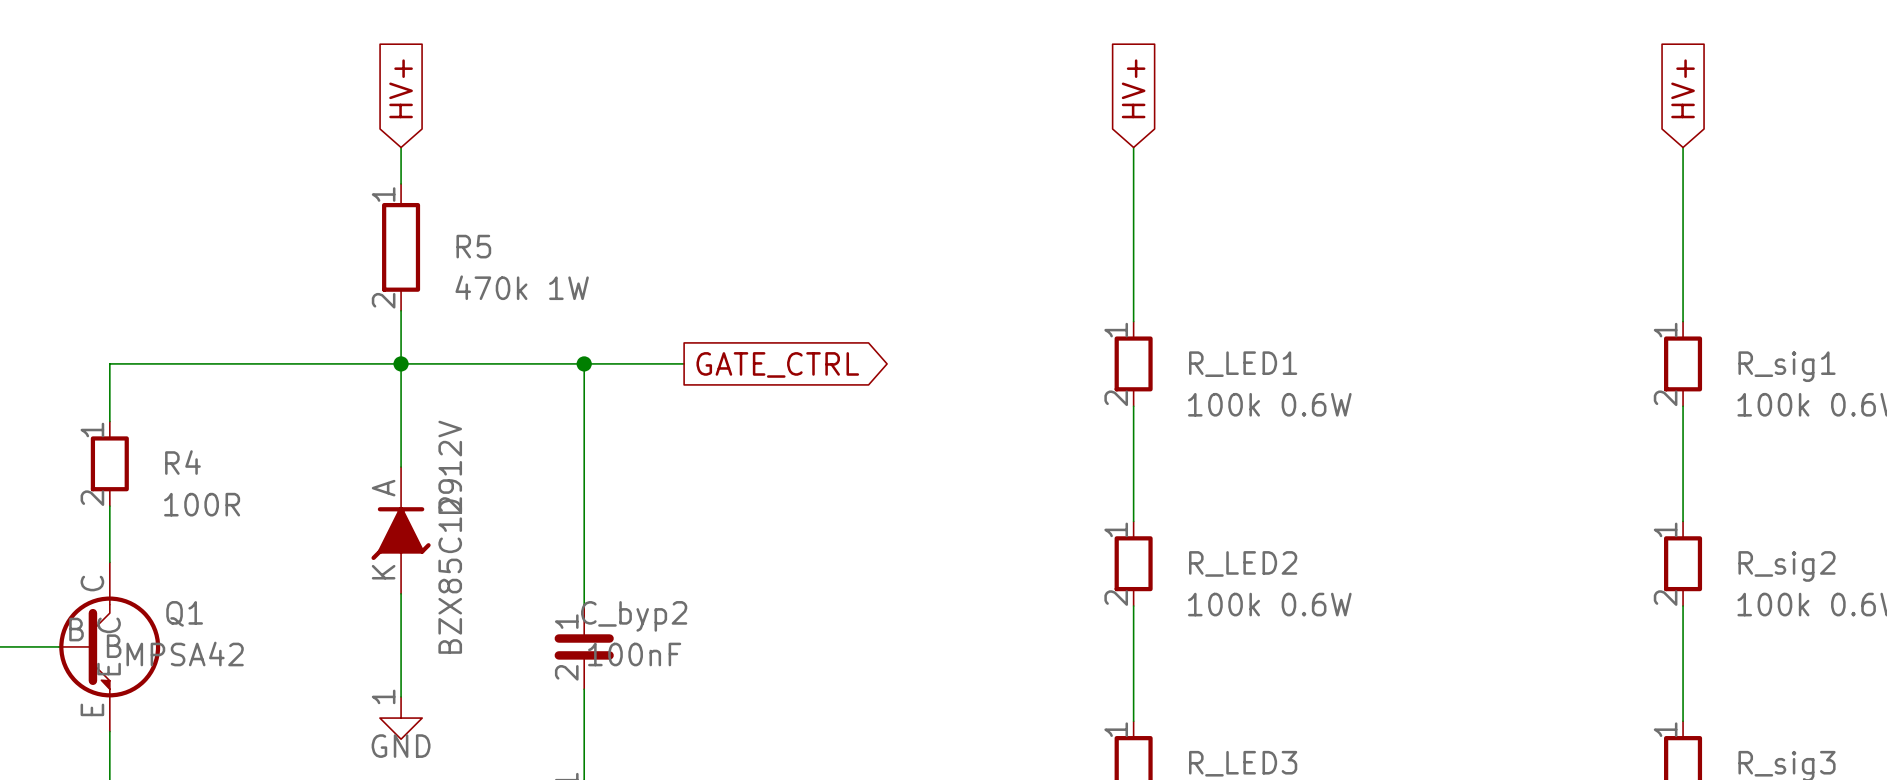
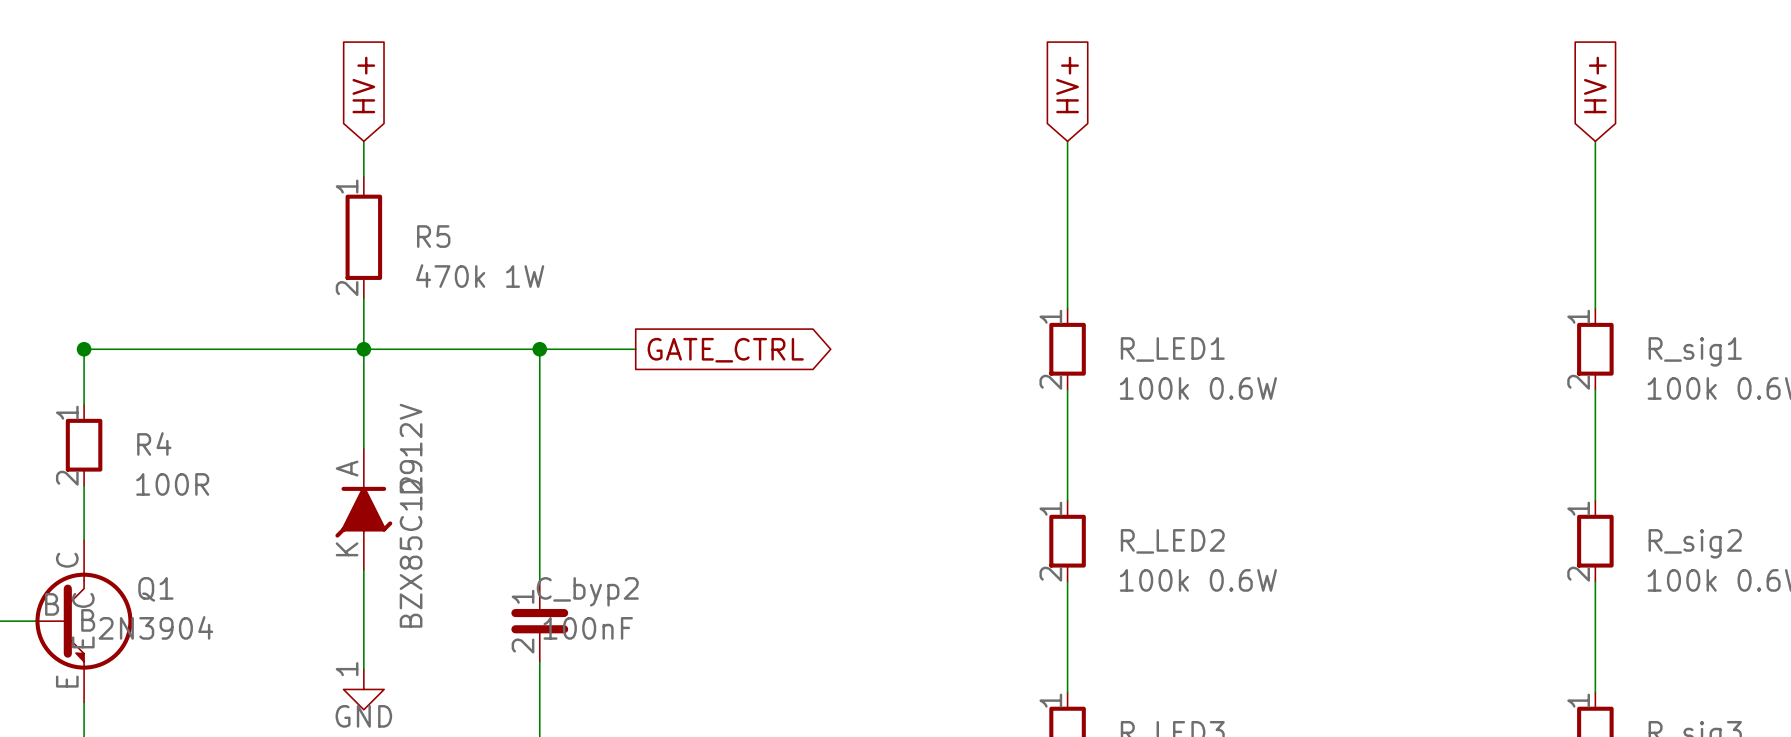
junction: none -> (84, 349)
Q1 value: MPSA42 (185, 654) -> 2N3904 (155, 627)

